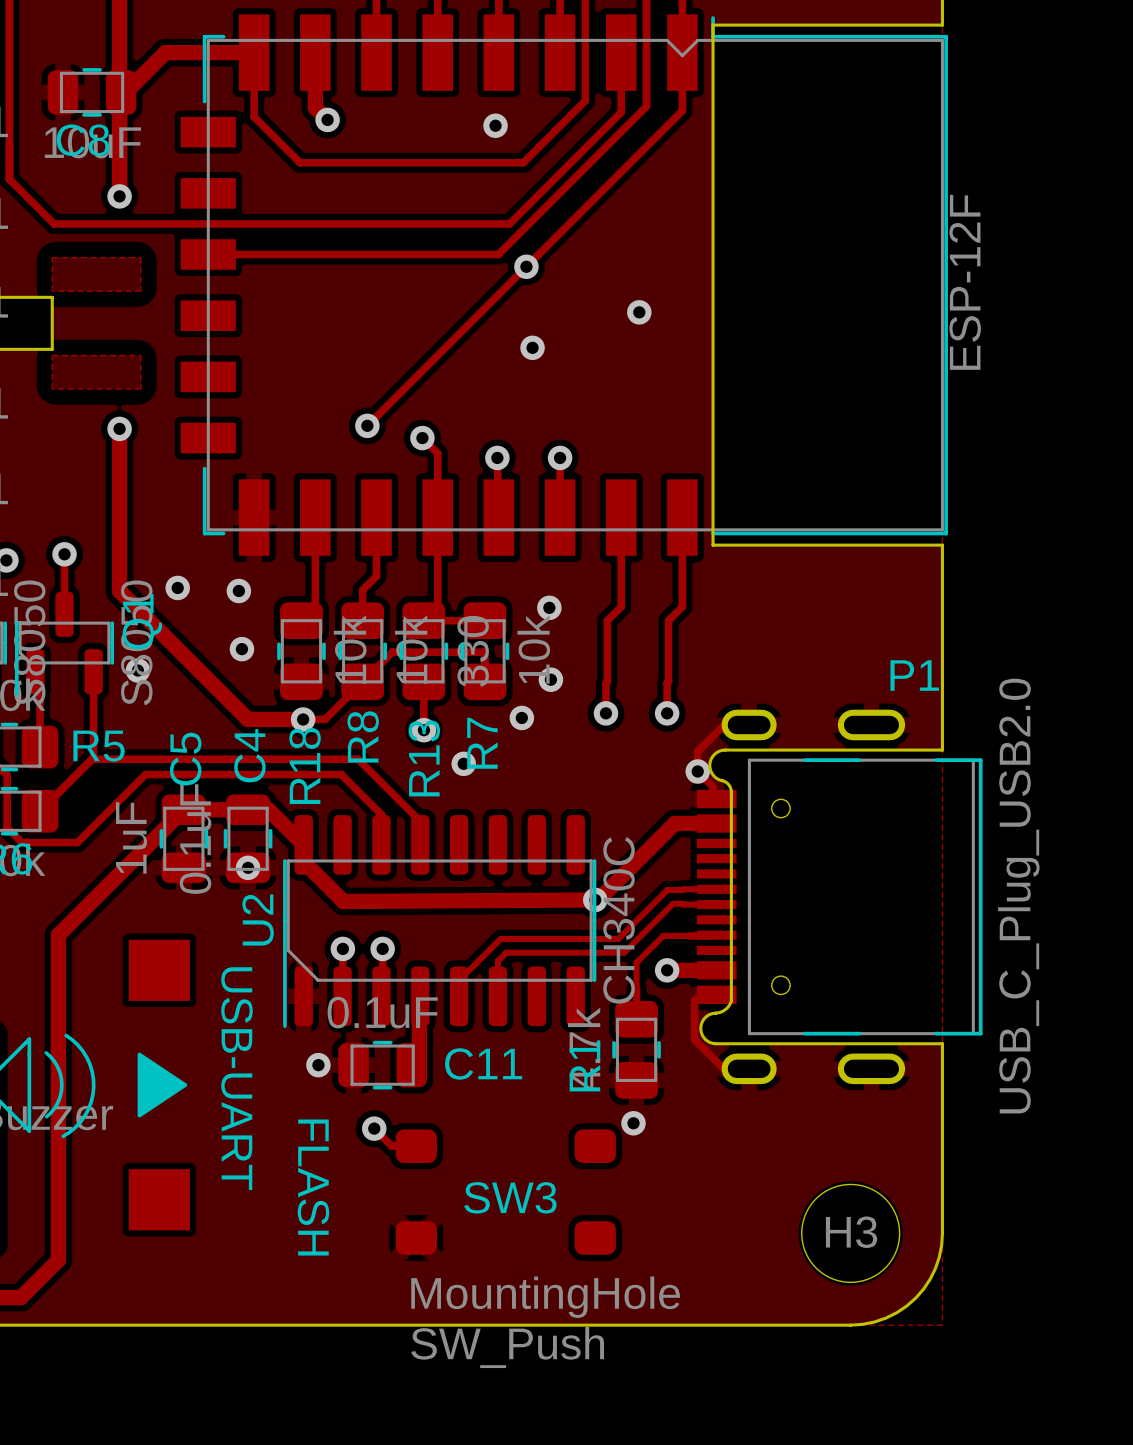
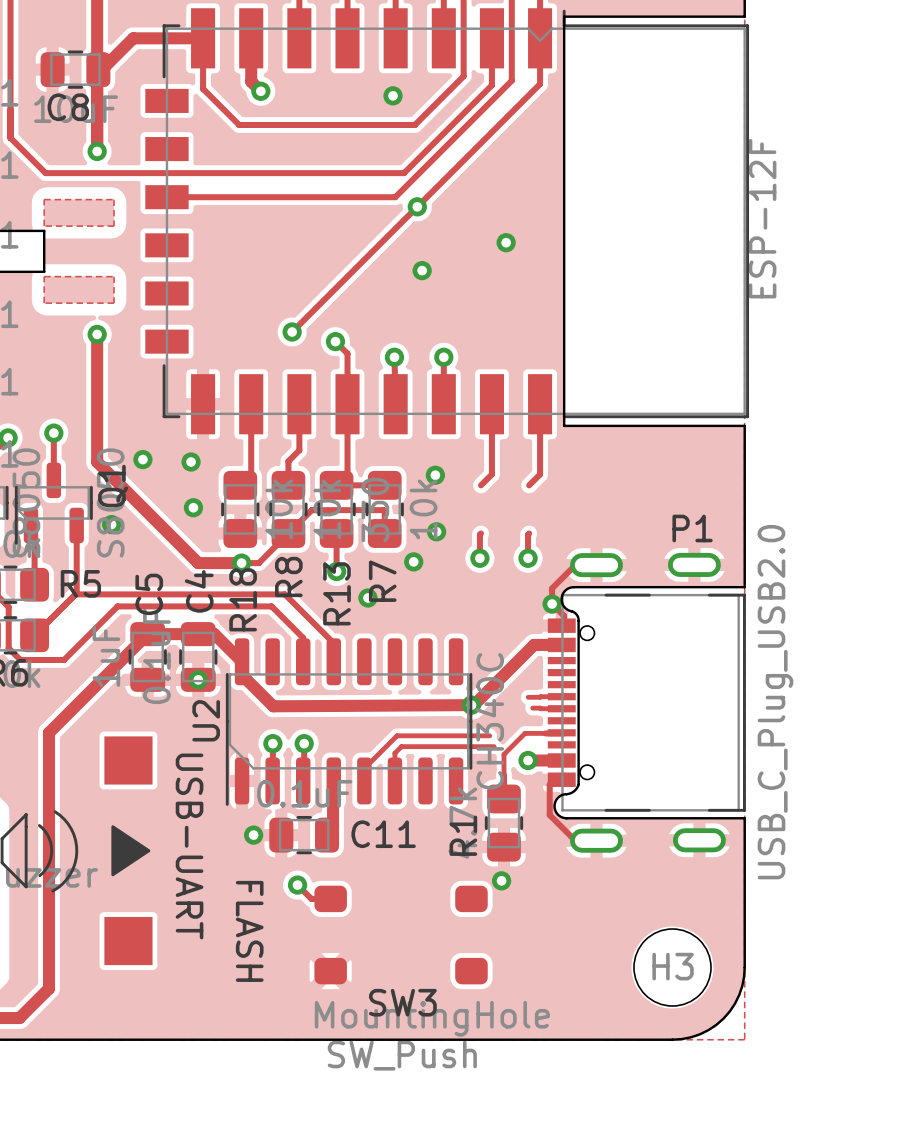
track: (607, 620) (607, 681) -> none
track: (668, 620) (668, 681) -> none
P1 footprint: [696, 709, 983, 1085] -> [547, 552, 746, 853]
track: (667, 890) (618, 938) -> none
track: (673, 903) (624, 952) -> none
SW3 name position: SW3 (510, 1197) -> SW3 (402, 1002)

